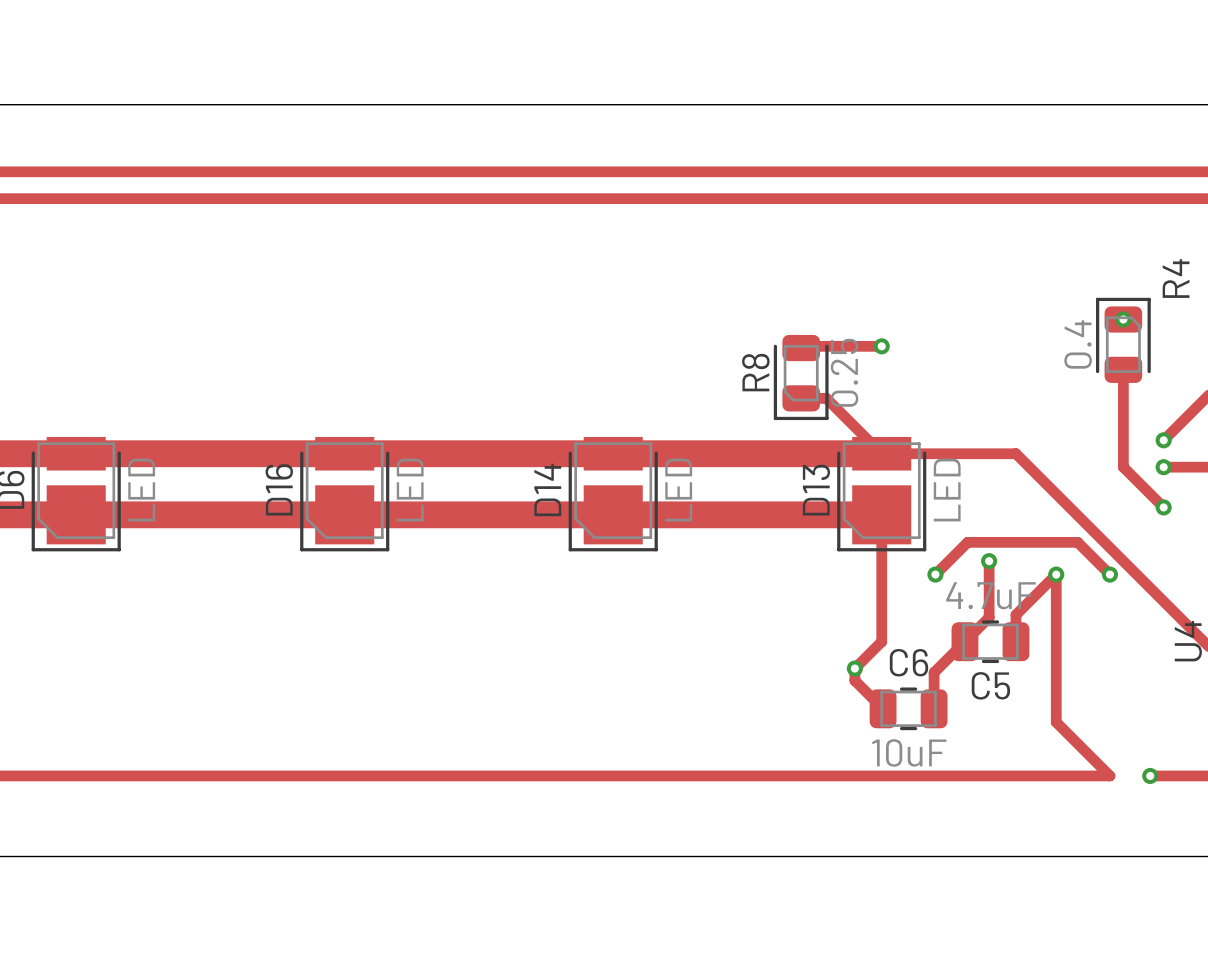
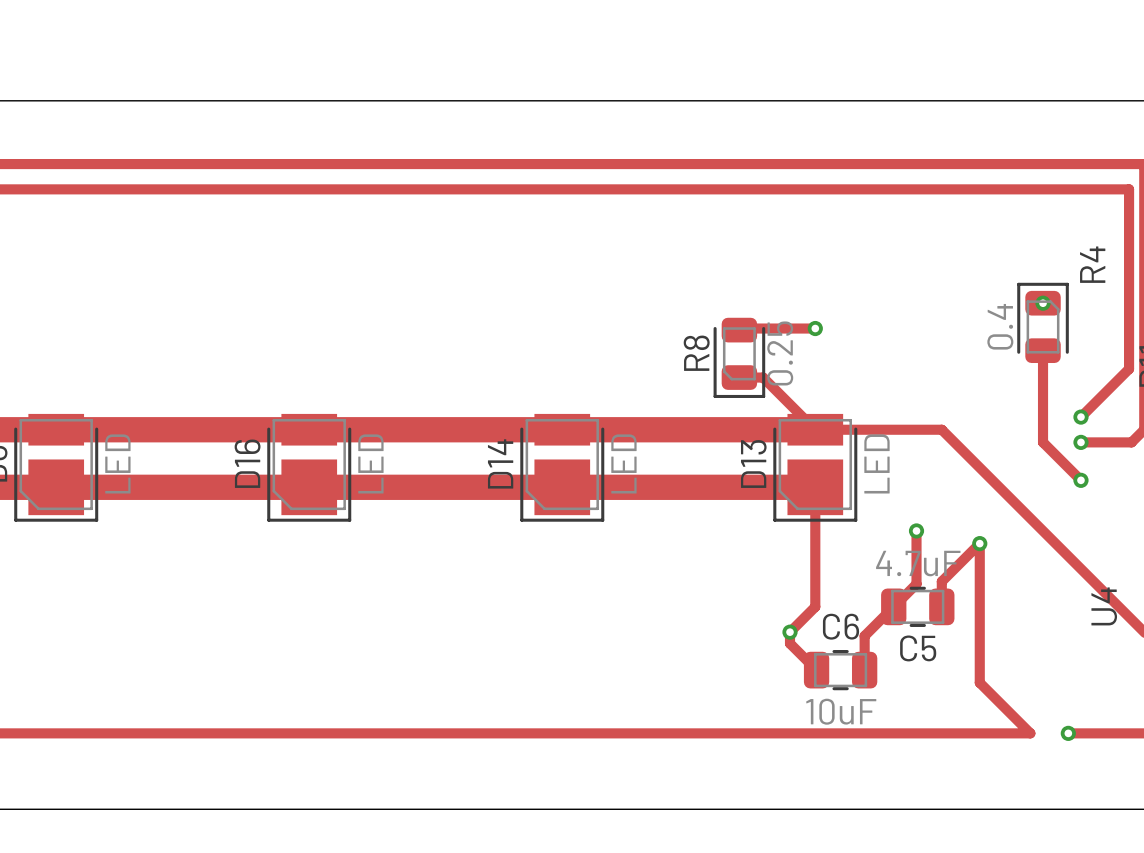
track: (935, 574) (967, 542) (1077, 542) (1109, 574) -> none
via: (935, 574) -> none
via: (1109, 574) -> none

